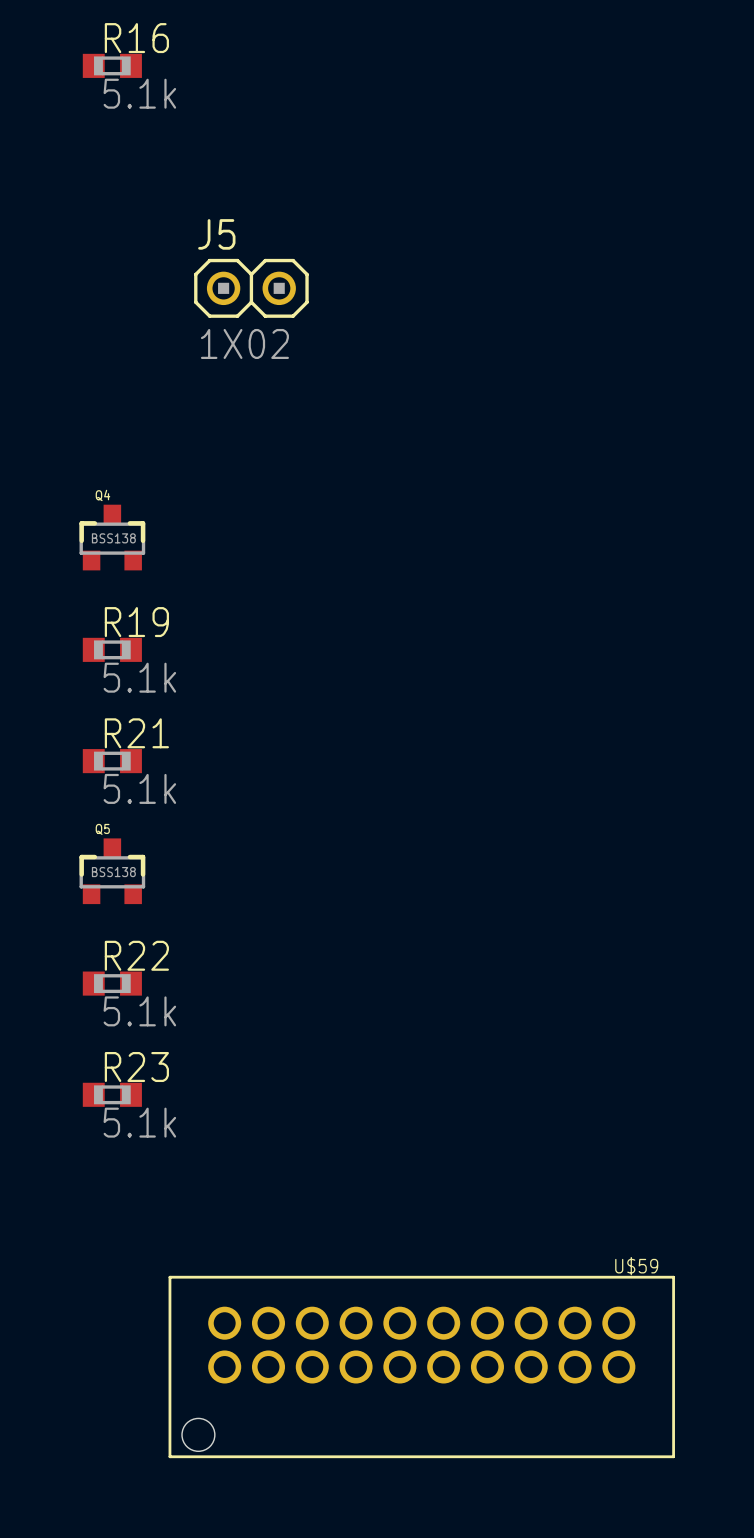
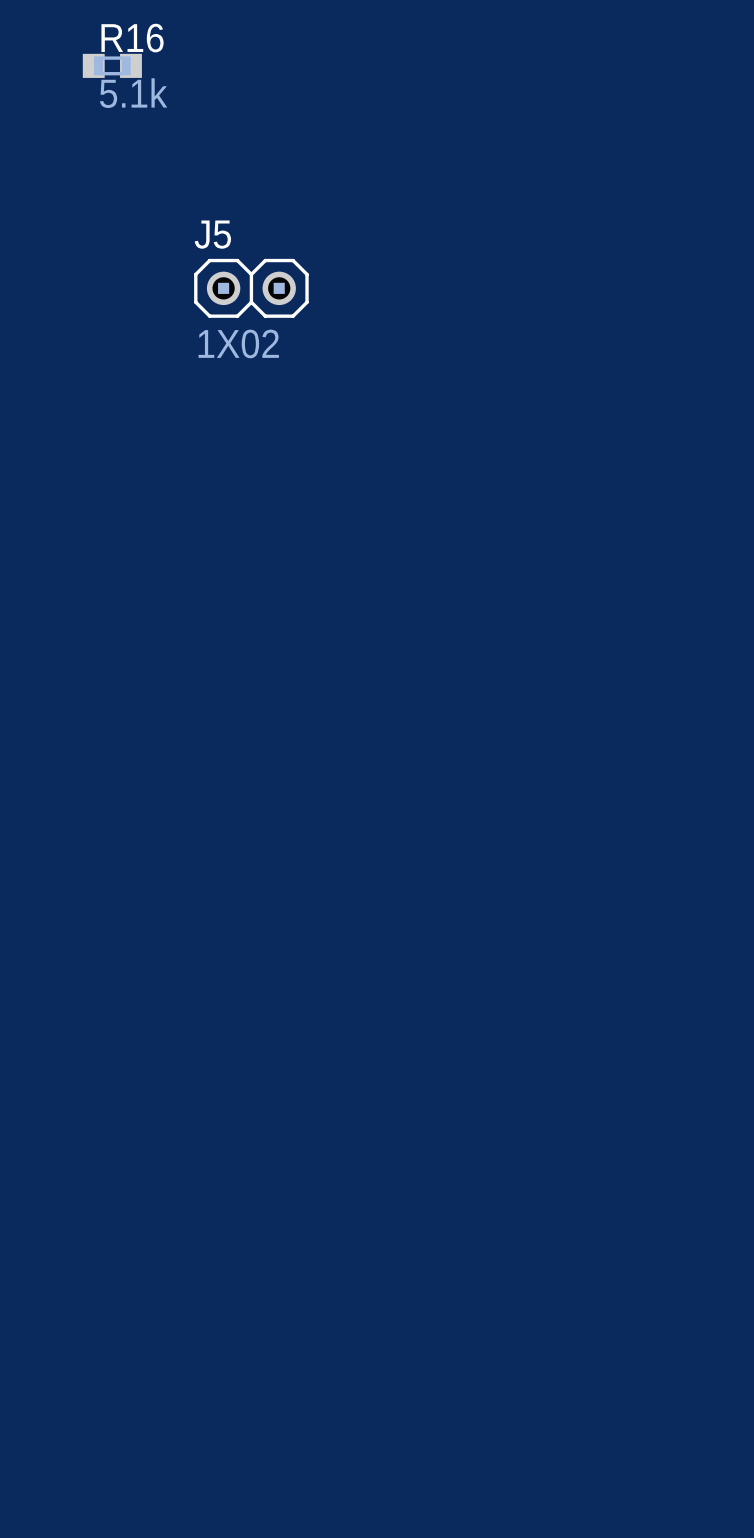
Q4: BSS138 (112, 537) -> none
R19: 5.1k (112, 649) -> none
R21: 5.1k (112, 761) -> none
Q5: BSS138 (112, 871) -> none
R22: 5.1k (112, 983) -> none
R23: 5.1k (112, 1094) -> none
U$59: (421, 1366) -> none

